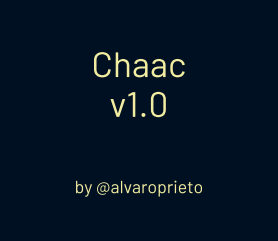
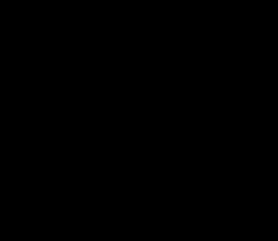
text: Chaac (139, 64) -> none
text: v1.0 (138, 104) -> none
text: by @alvaroprieto (139, 188) -> none

